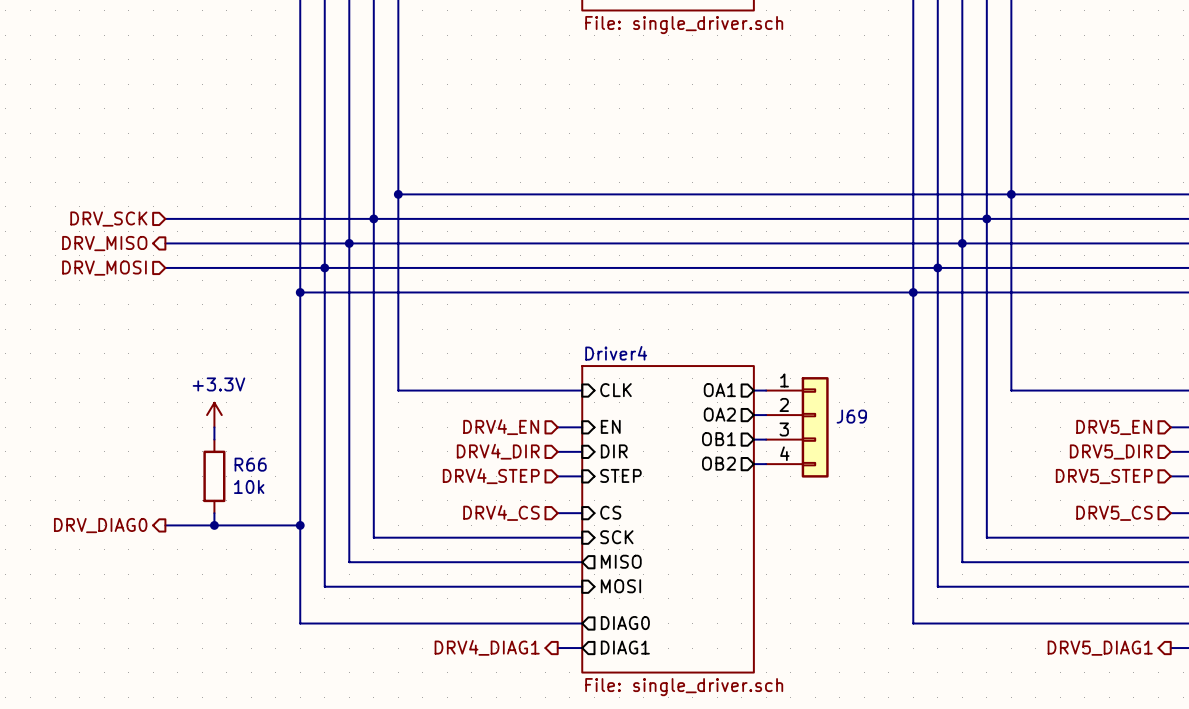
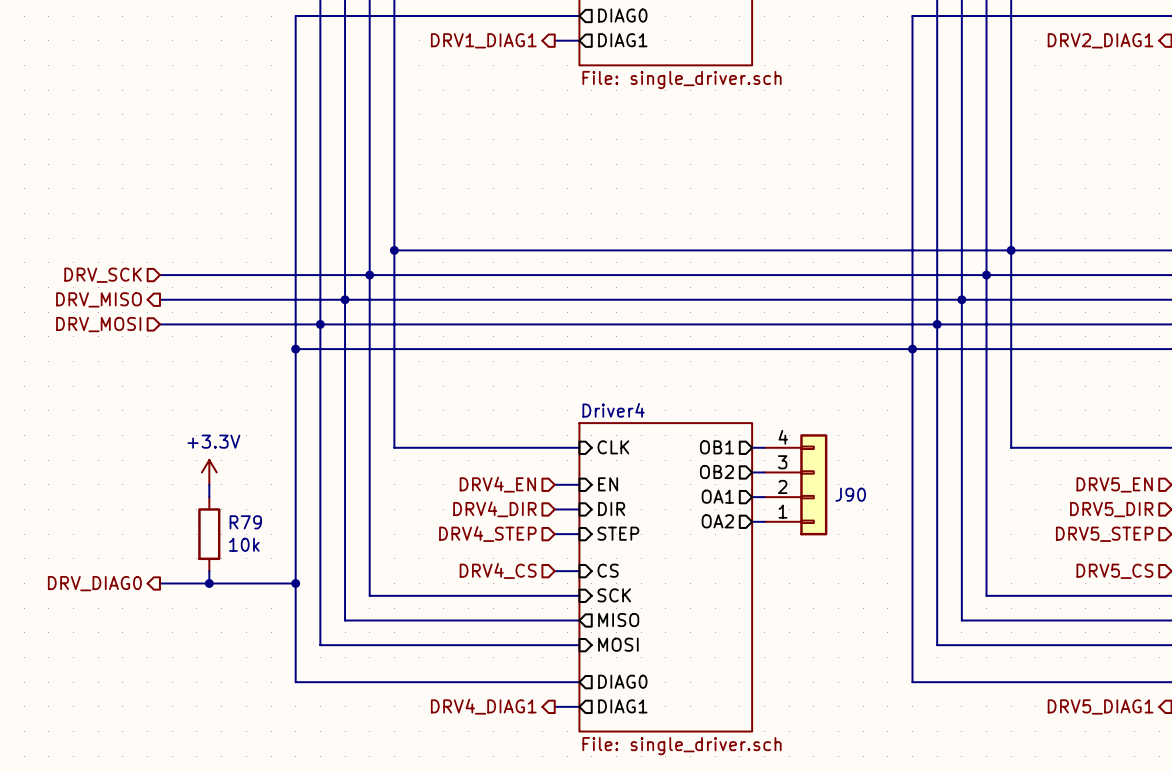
sheet pin: OA1 (719, 390) -> OB1 (716, 447)
sheet pin: OA2 (719, 414) -> OB2 (716, 472)
J69 name: J69 (851, 416) -> J90 (850, 494)
J69 flip: as is (815, 427) -> up-down (813, 484)
sheet pin: OB1 (718, 439) -> OA1 (717, 496)
sheet pin: OB2 (718, 463) -> OA2 (717, 521)
R66 name: R66 (250, 464) -> R79 (245, 522)

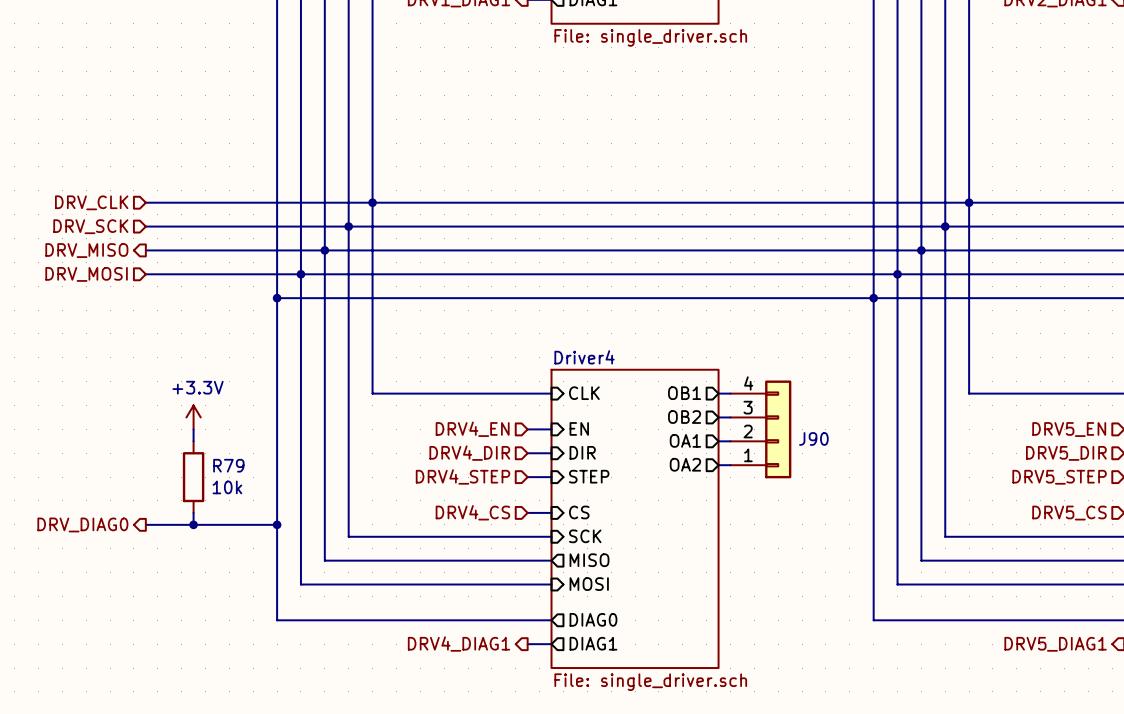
hierarchical label: none -> DRV_CLK (91, 202)
wire: none -> (145, 202) (372, 202)

